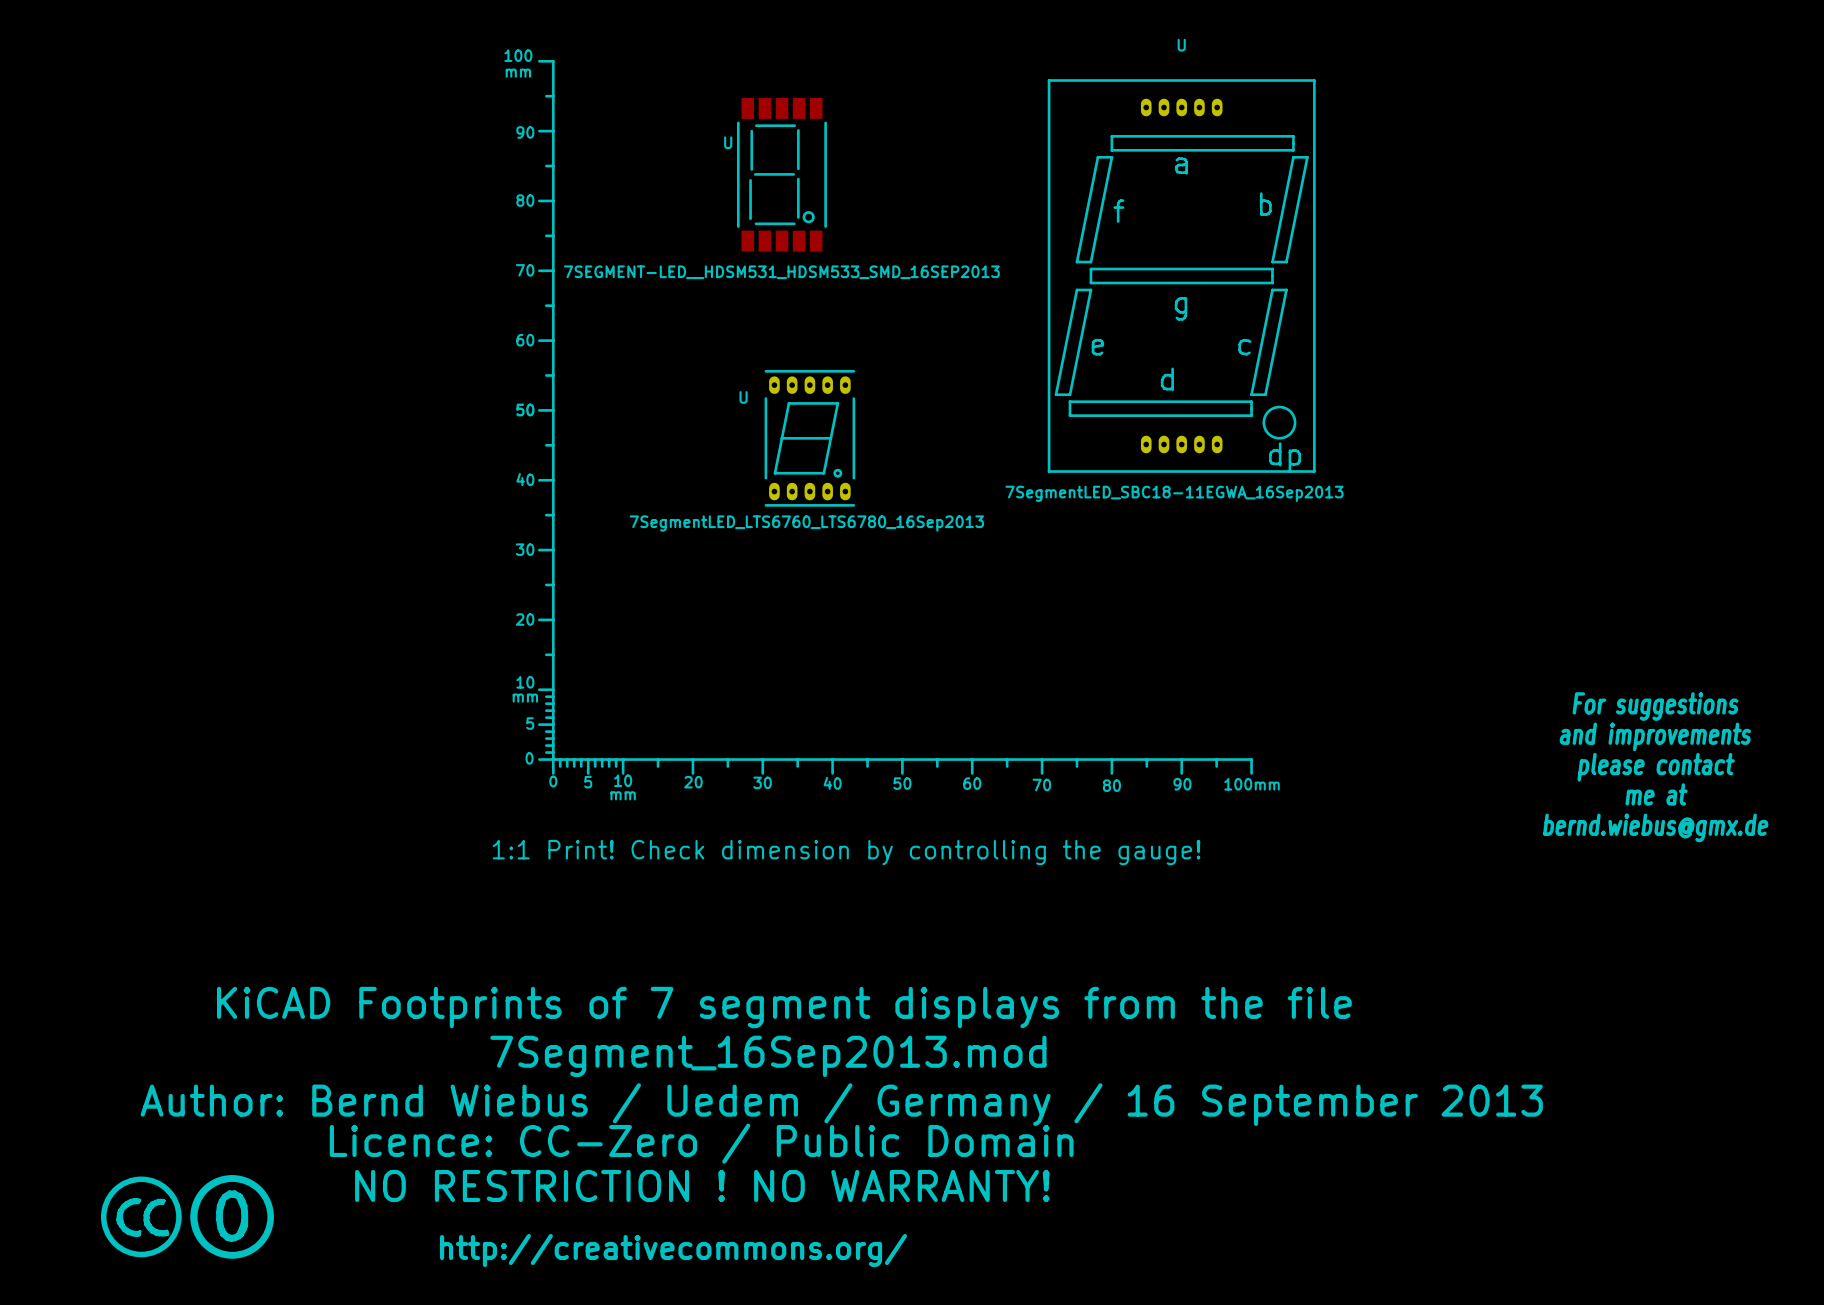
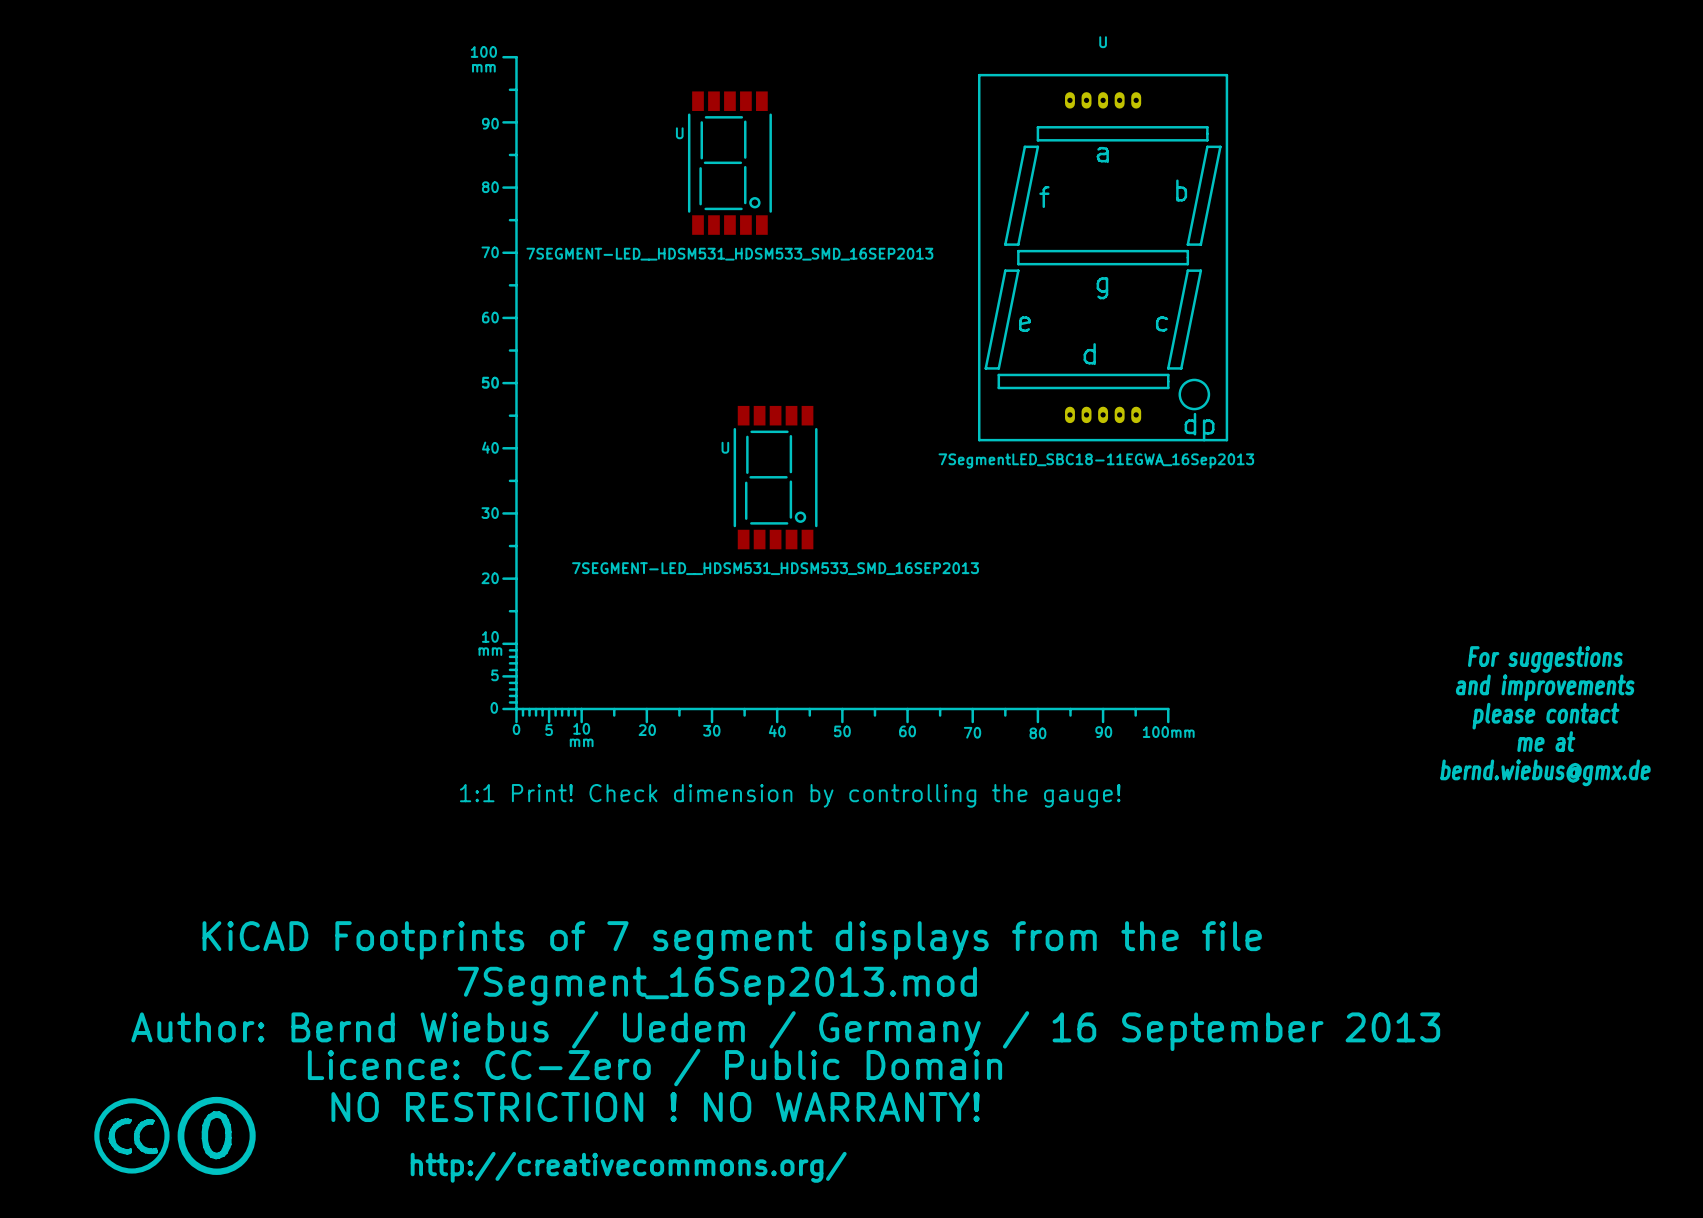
U: 7SegmentLED_LTS6760_LTS6780_16Sep2013 (809, 438) -> none
U: none -> 7SEGMENT-LED__HDSM531_HDSM533_SMD_16SEP2013 (775, 477)

